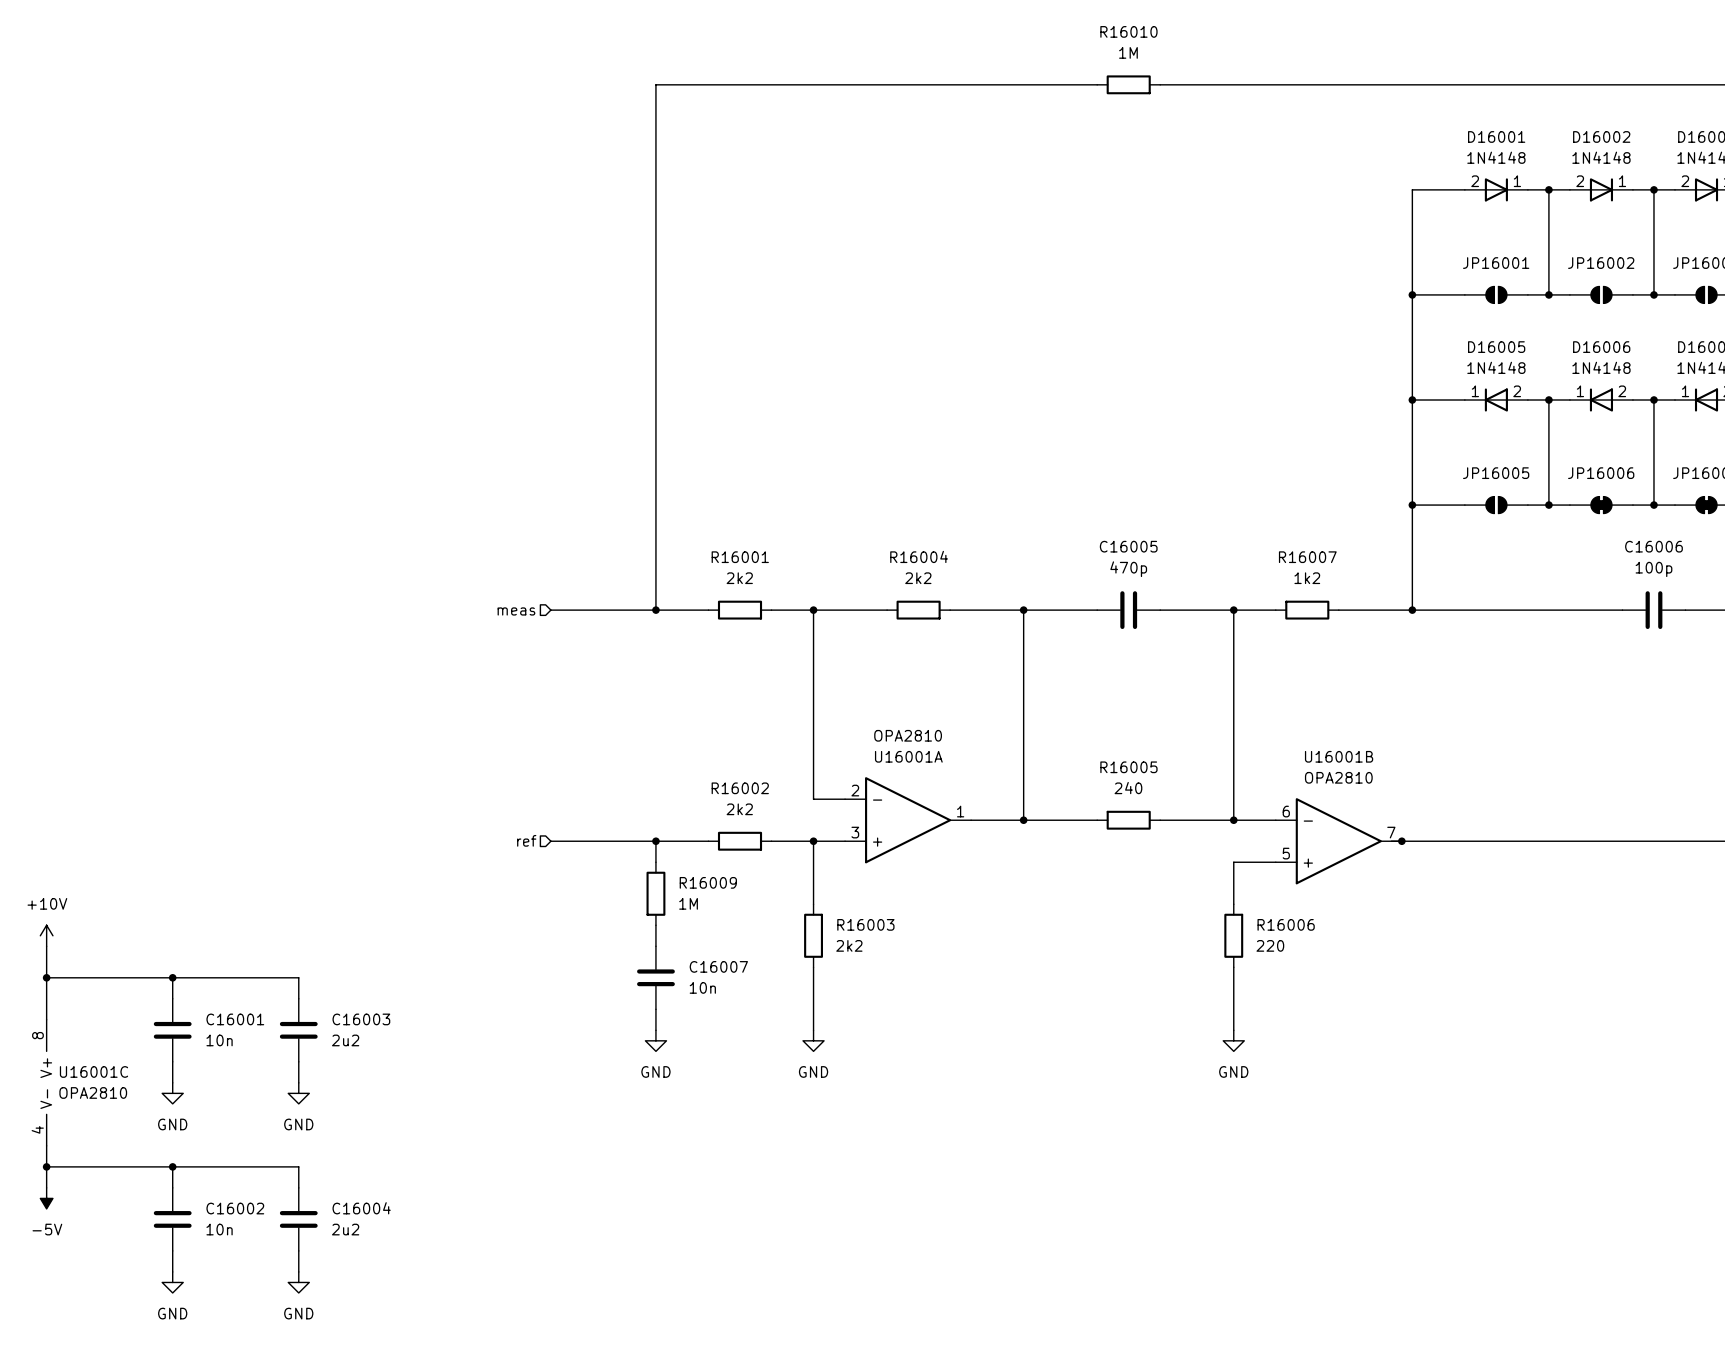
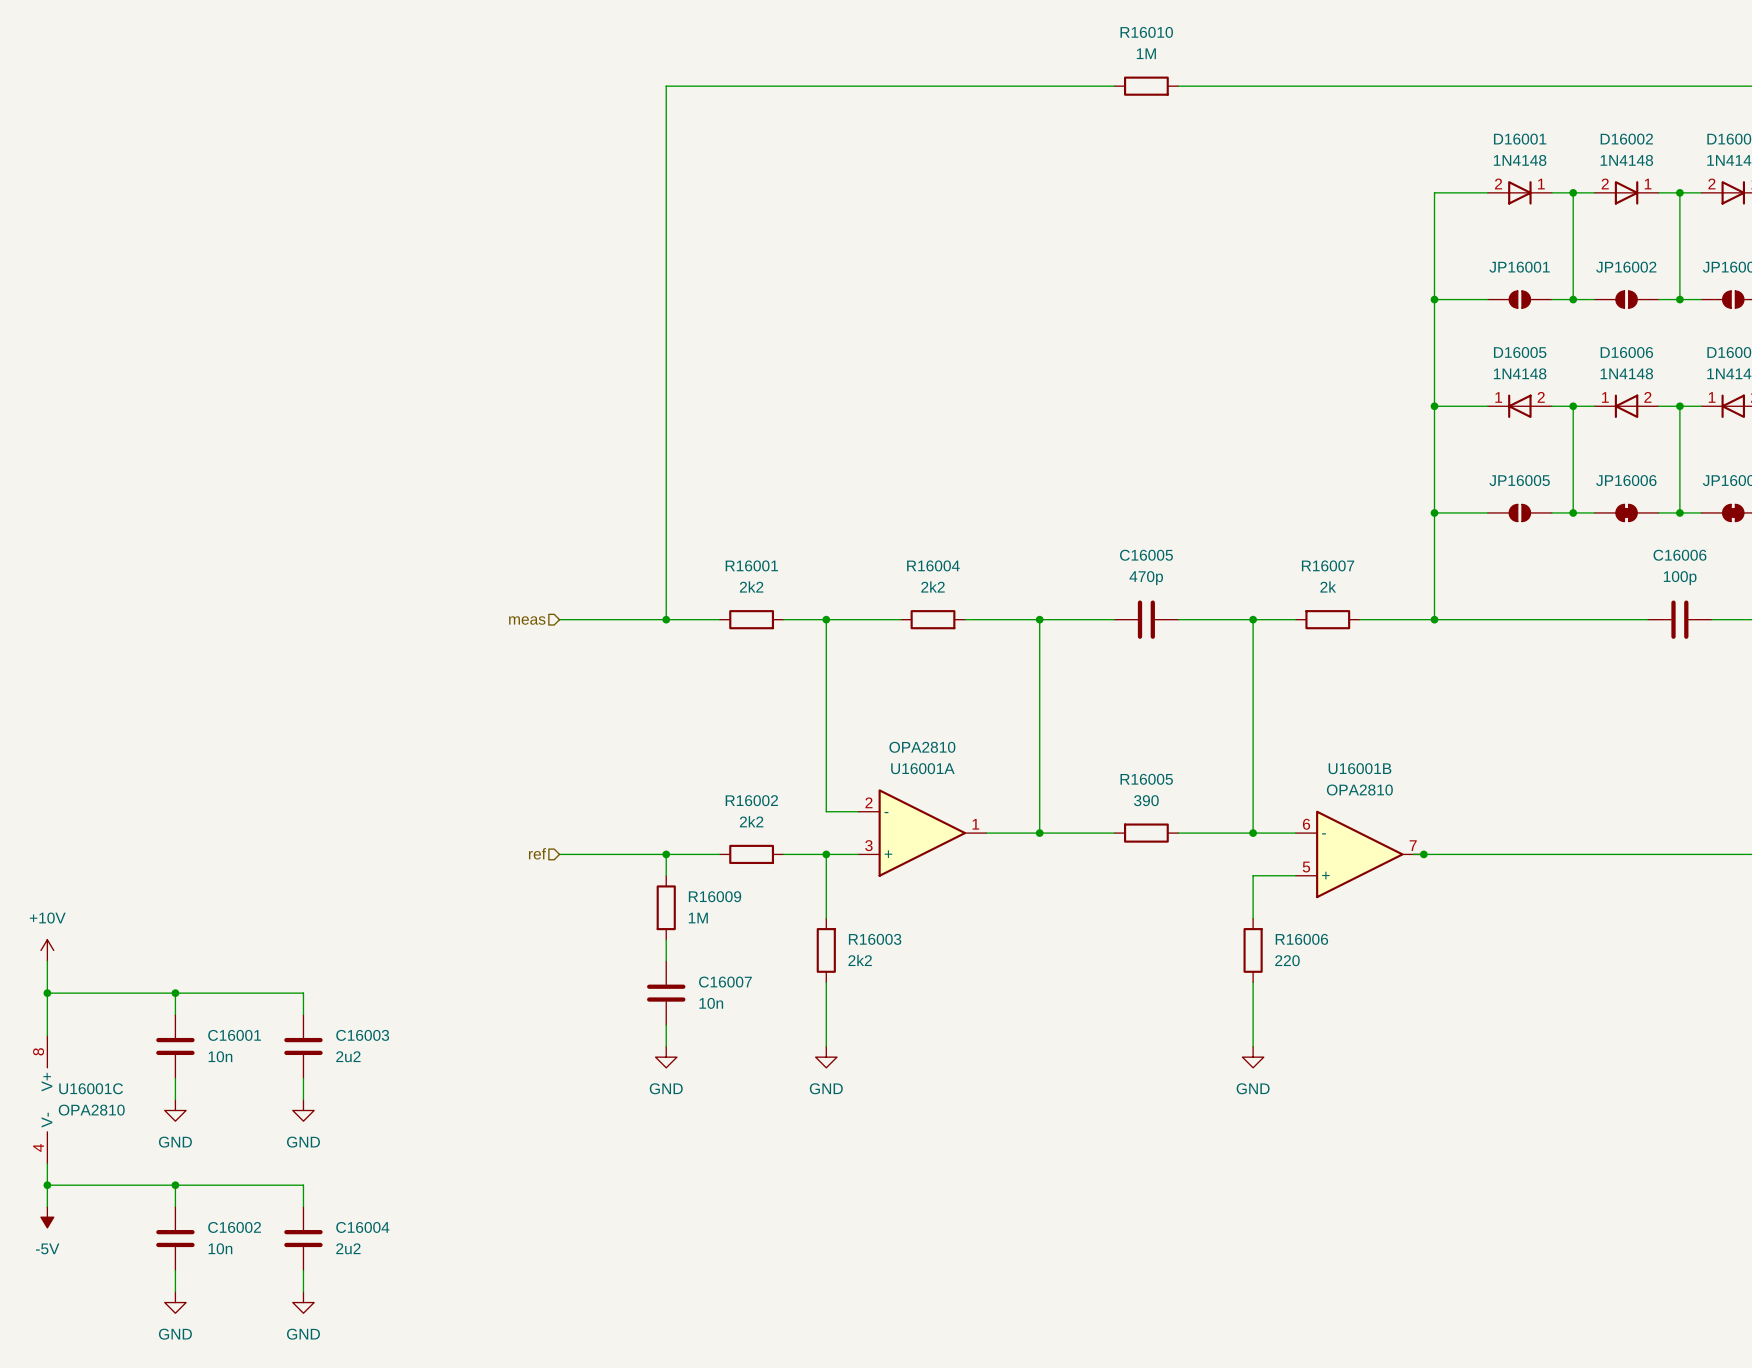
R16007 value: 1k2 (1307, 578) -> 2k (1328, 586)
R16005 value: 240 (1128, 788) -> 390 (1146, 800)

